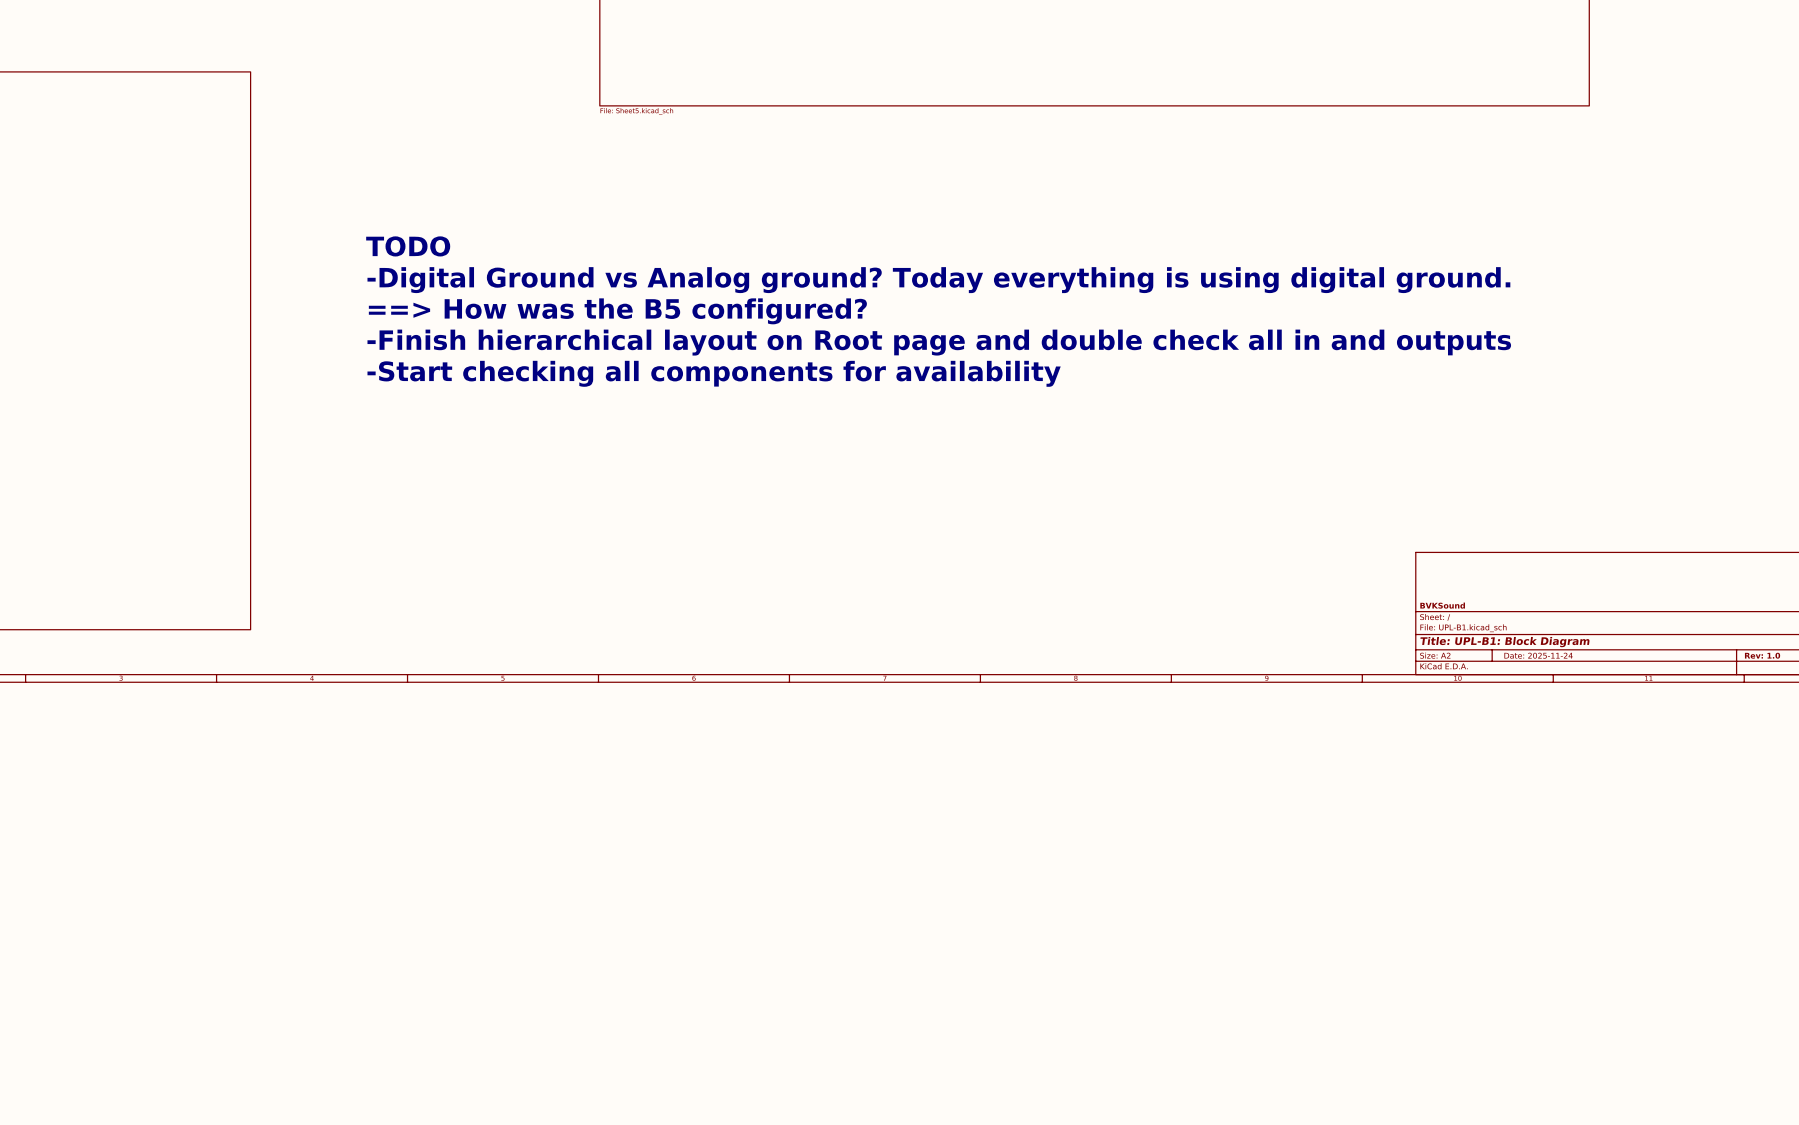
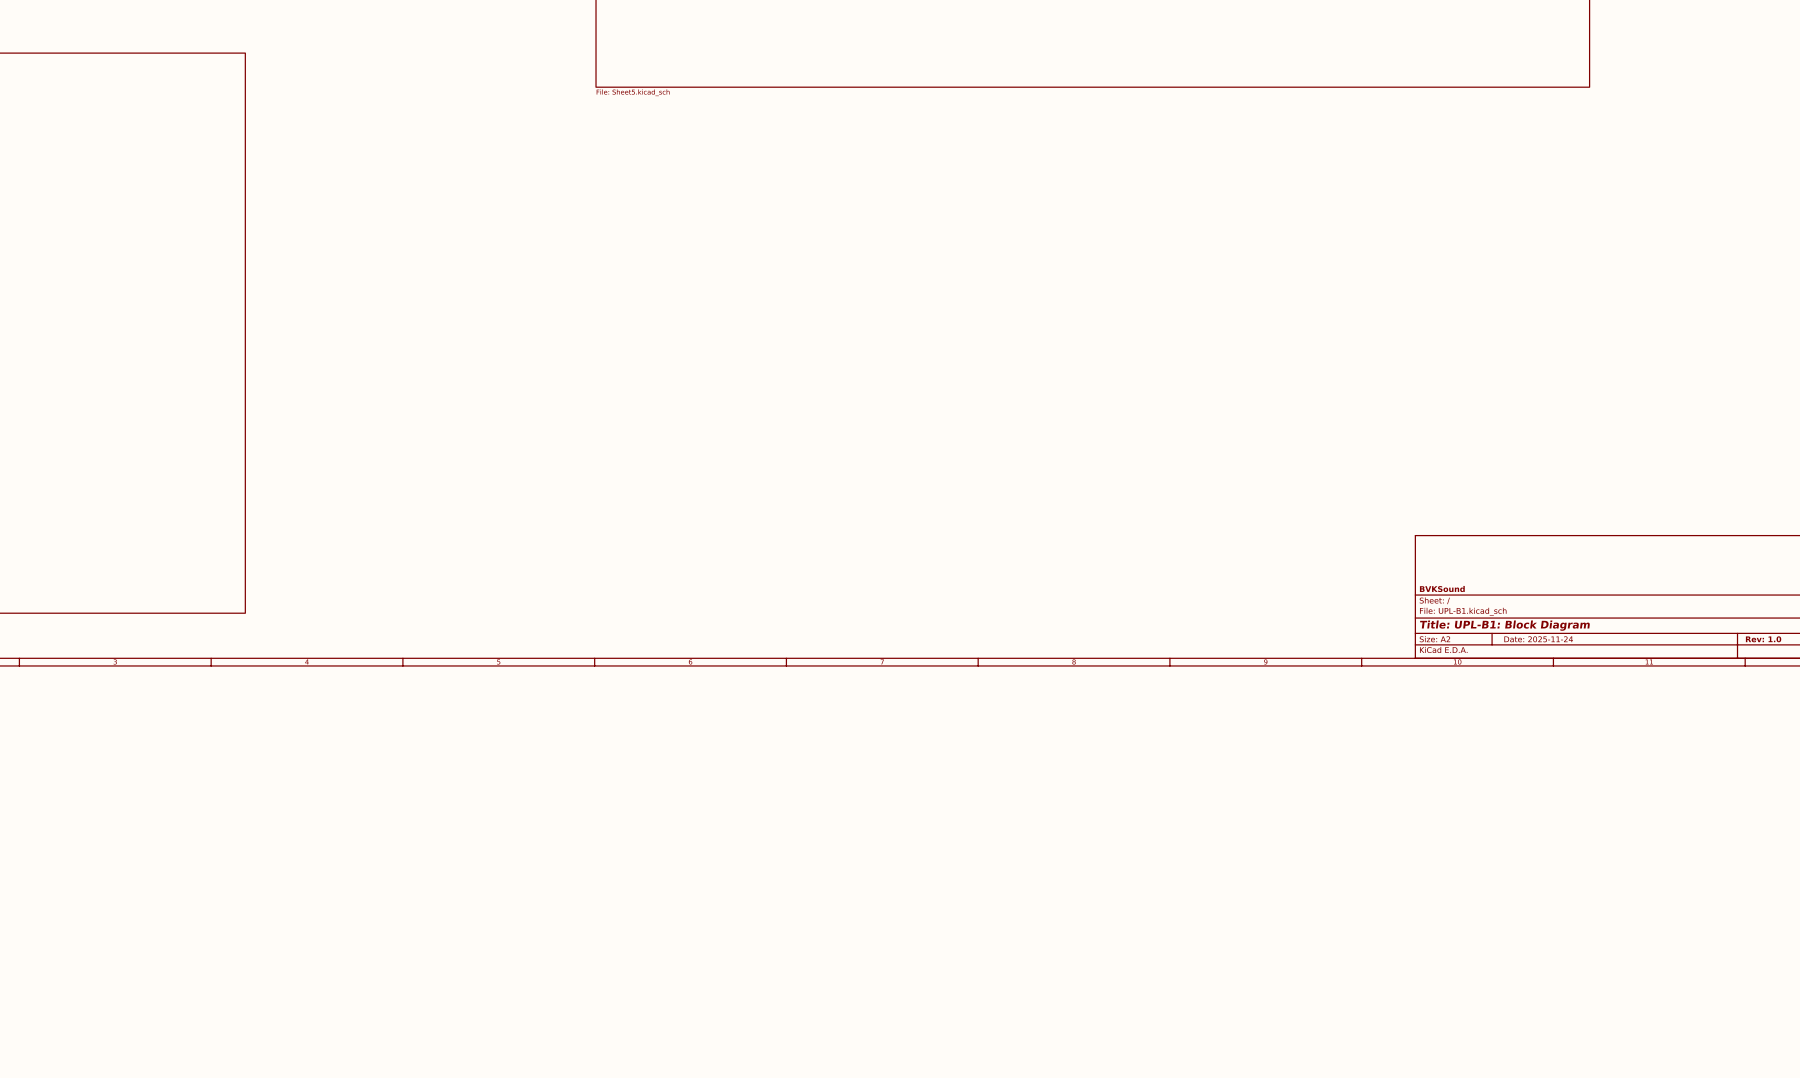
text: TODO (408, 246) -> none
text: -Digital Ground vs Analog ground? Today everything is using digital ground. (938, 280) -> none
text: ==> How was the B5 configured? (617, 311) -> none
text: -Finish hierarchical layout on Root page and double check all in and outputs (939, 342) -> none
text: -Start checking all components for availability (714, 373) -> none

